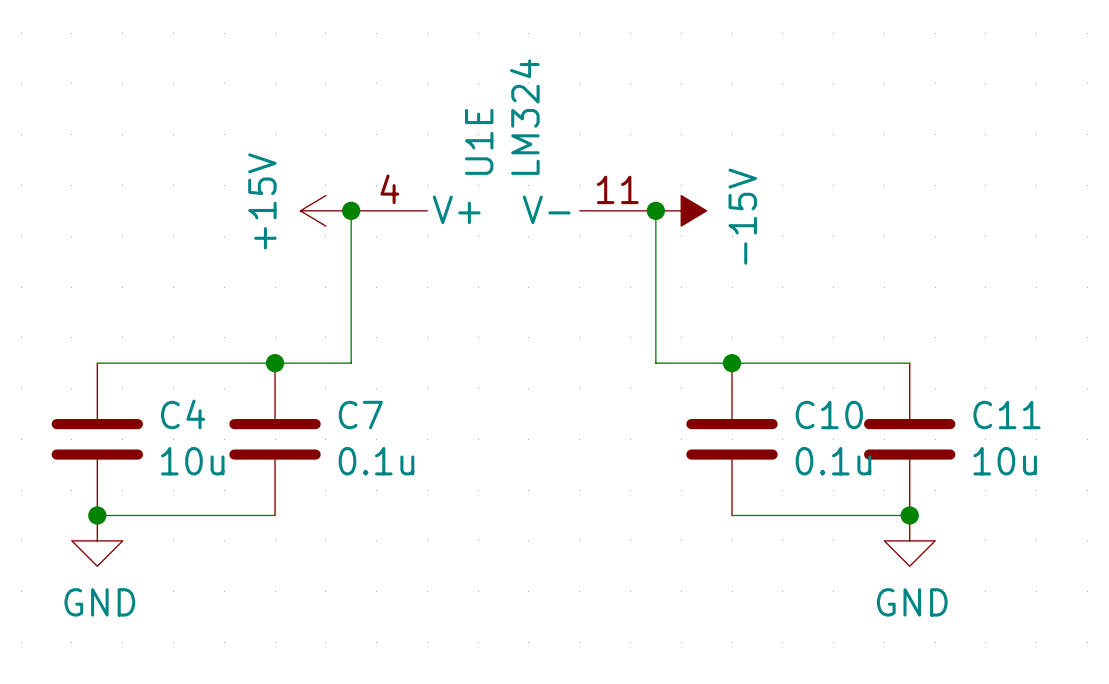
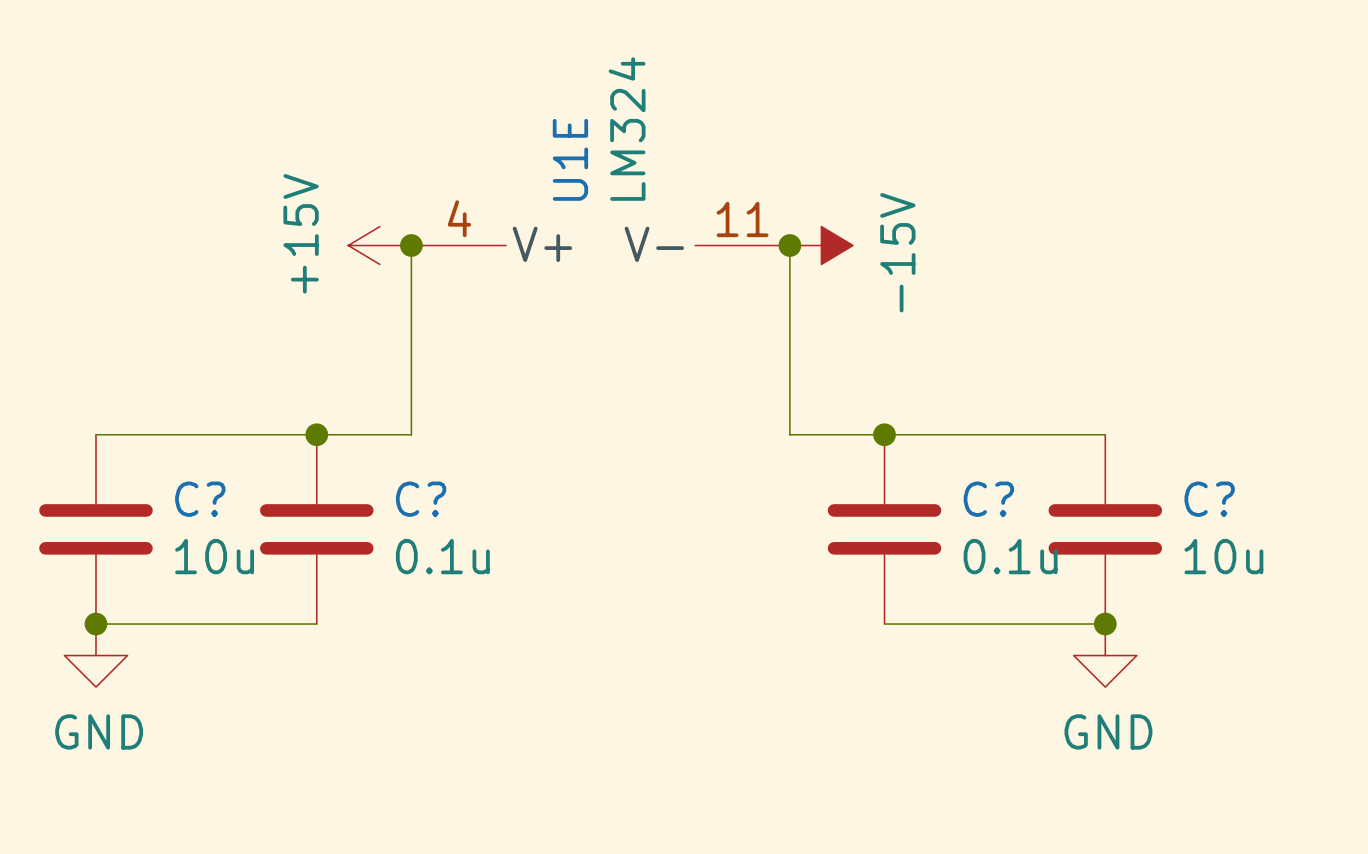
C4 name: C4 (183, 414) -> C? (200, 499)
C7 name: C7 (360, 415) -> C? (421, 499)
C10 name: C10 (829, 415) -> C? (988, 499)
C11 name: C11 (1006, 415) -> C? (1209, 499)

